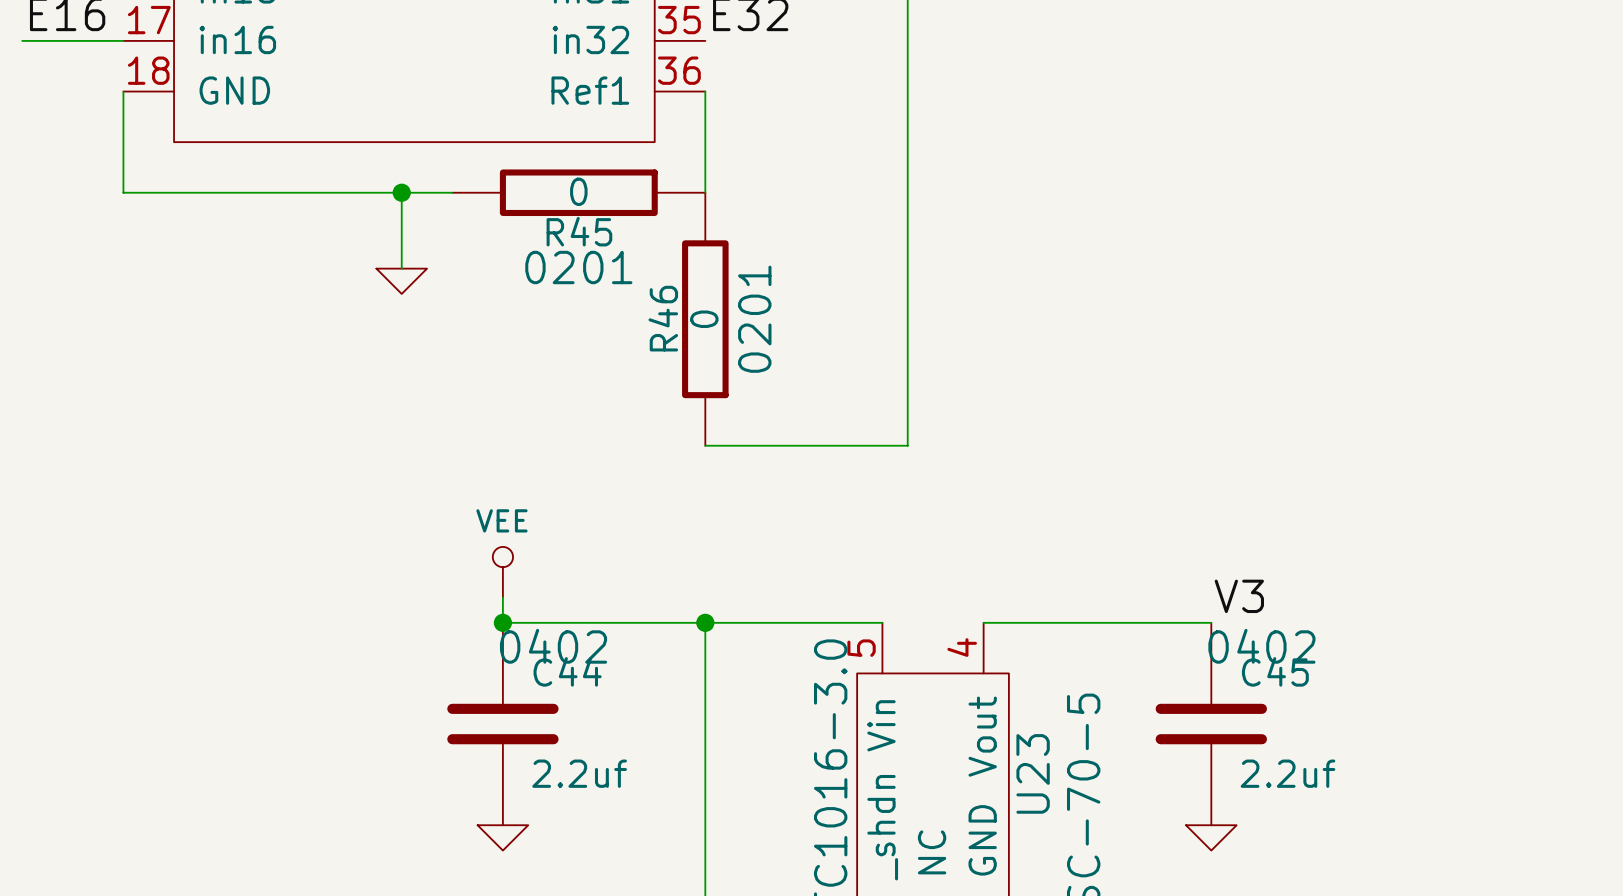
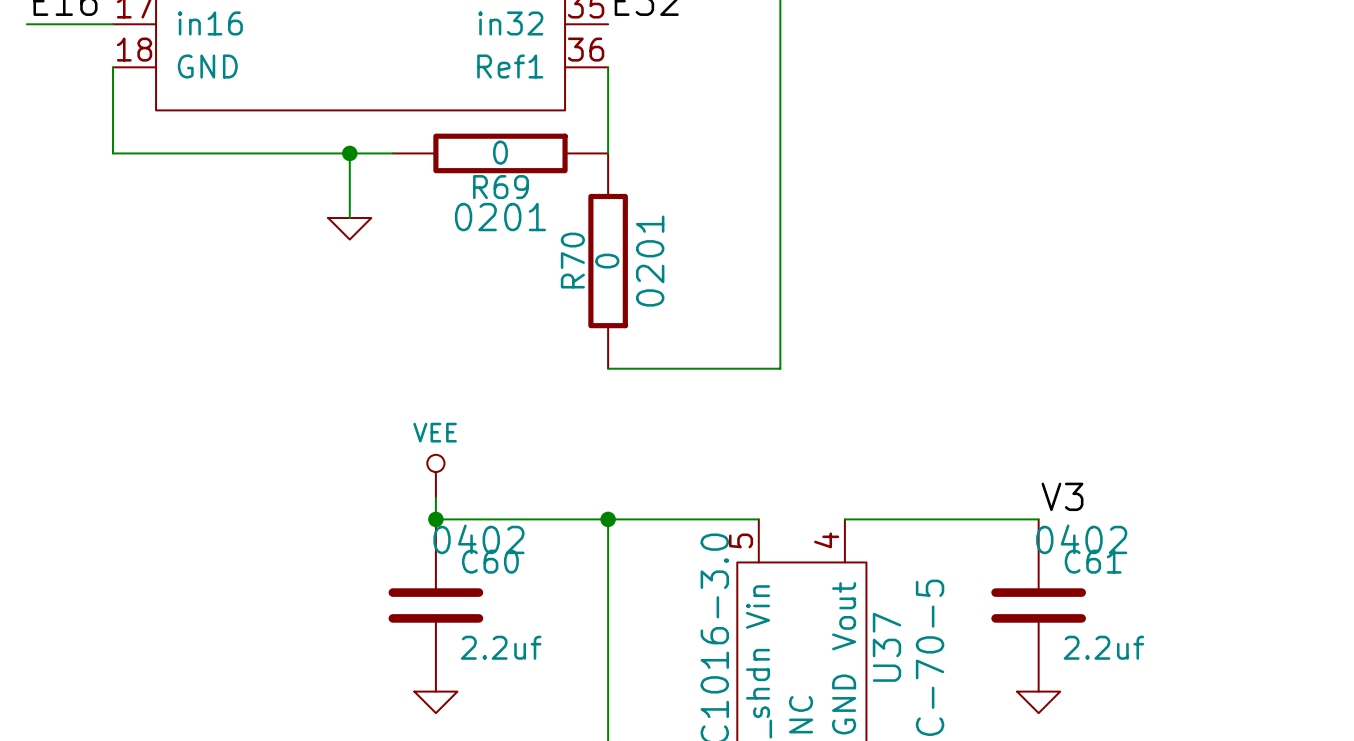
R45 name: R45 (579, 231) -> R69 (500, 187)
R46 name: R46 (663, 318) -> R70 (572, 260)
C44 name: C44 (567, 671) -> C60 (490, 561)
C45 name: C45 (1275, 671) -> C61 (1093, 561)
U23 name: U23 (1033, 773) -> U37 (887, 647)

